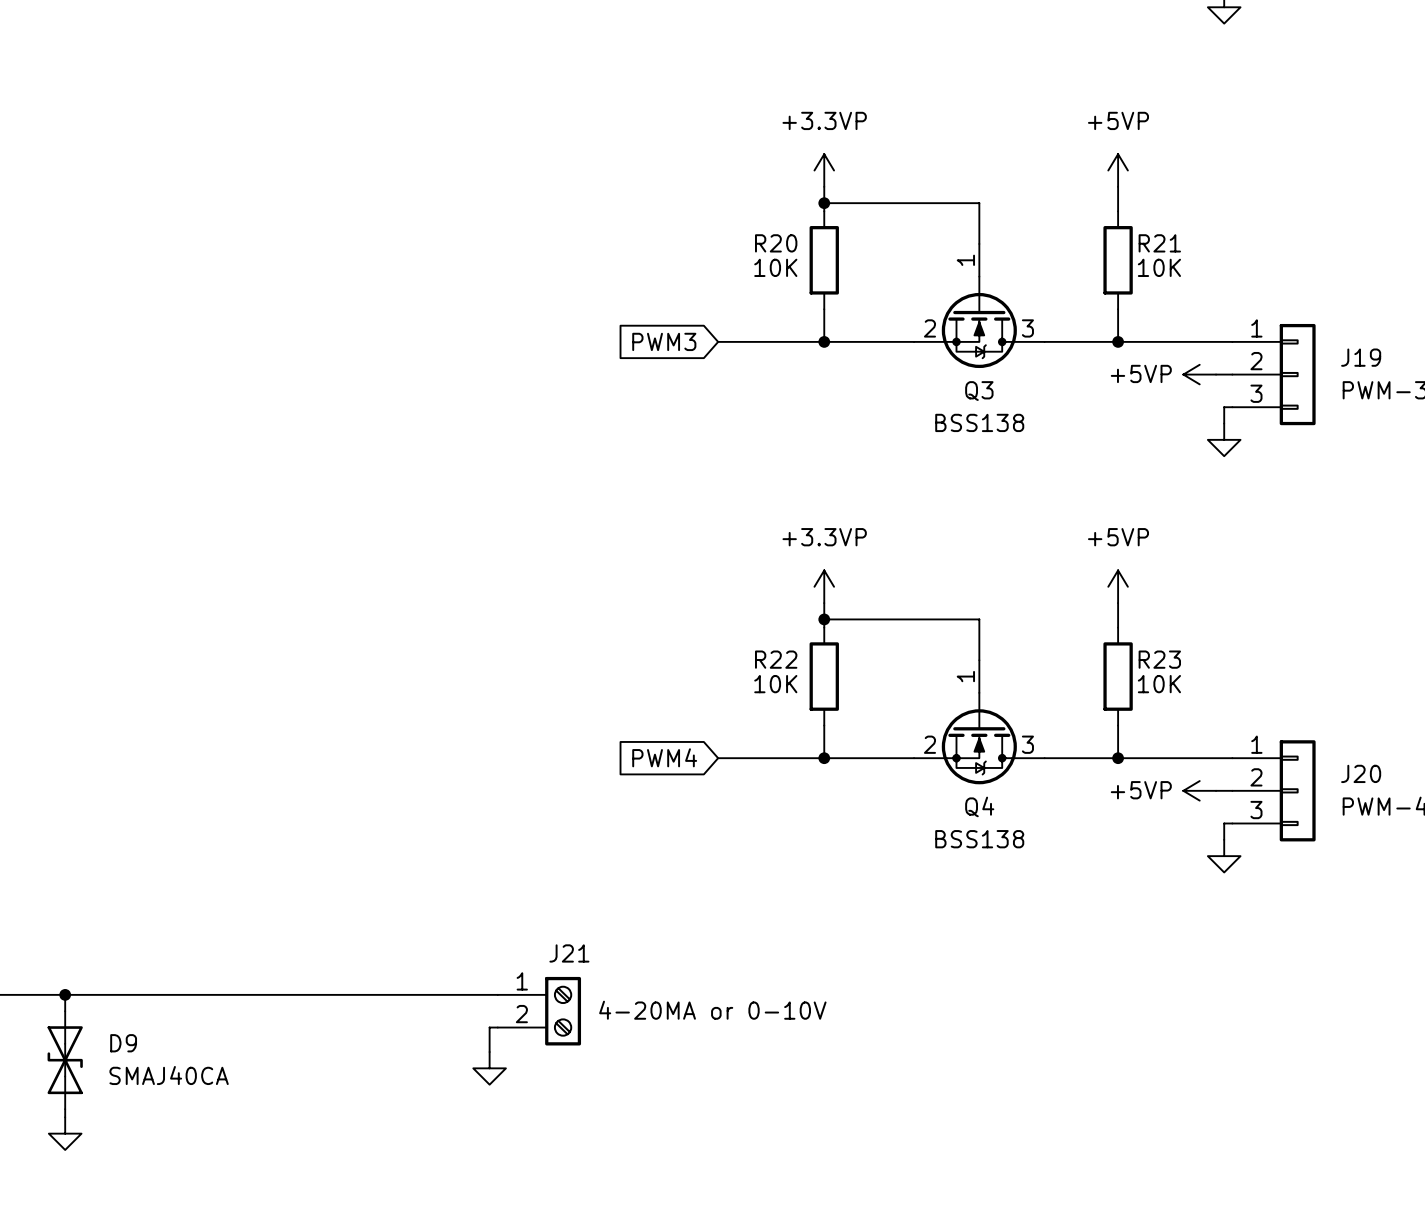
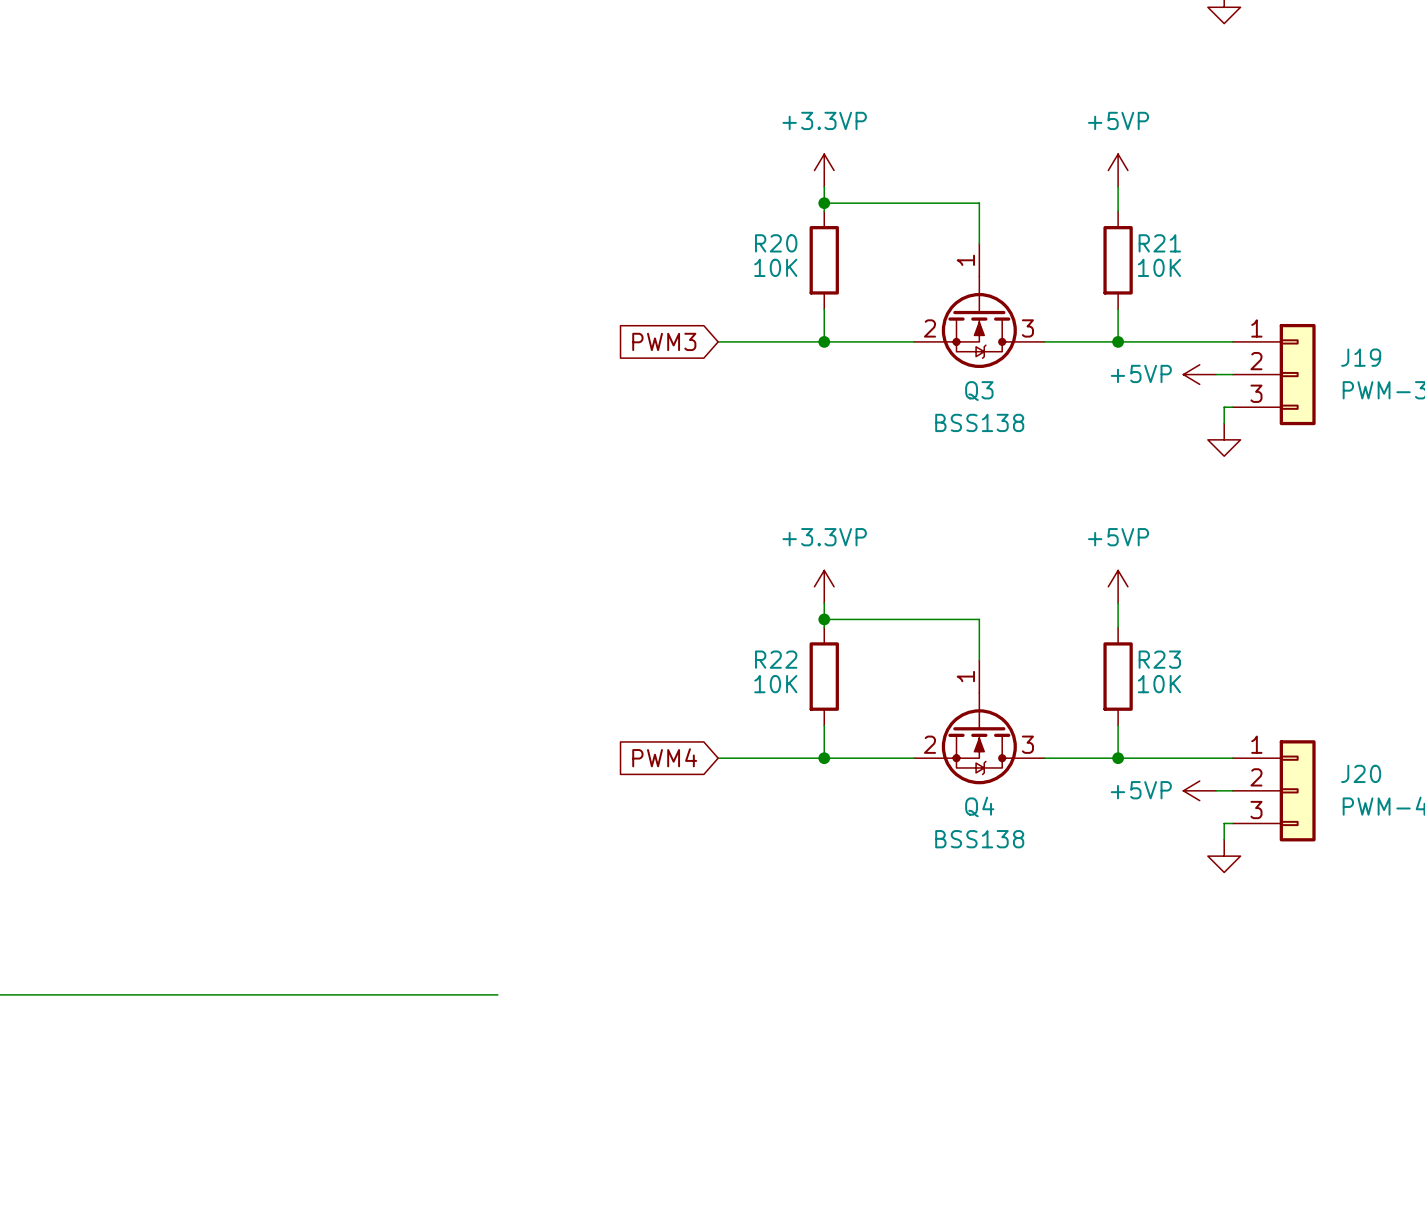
wire: (65, 994) (65, 1011) -> none
junction: (65, 994) -> none
J21: 4-20MA or 0-10V (539, 1011) -> none
wire: (497, 1027) (489, 1027) (489, 1052) -> none
D9: SMAJ40CA (65, 1060) -> none
power symbol: (489, 1068) -> none
wire: (65, 1109) (65, 1117) -> none
power symbol: (65, 1133) -> none

